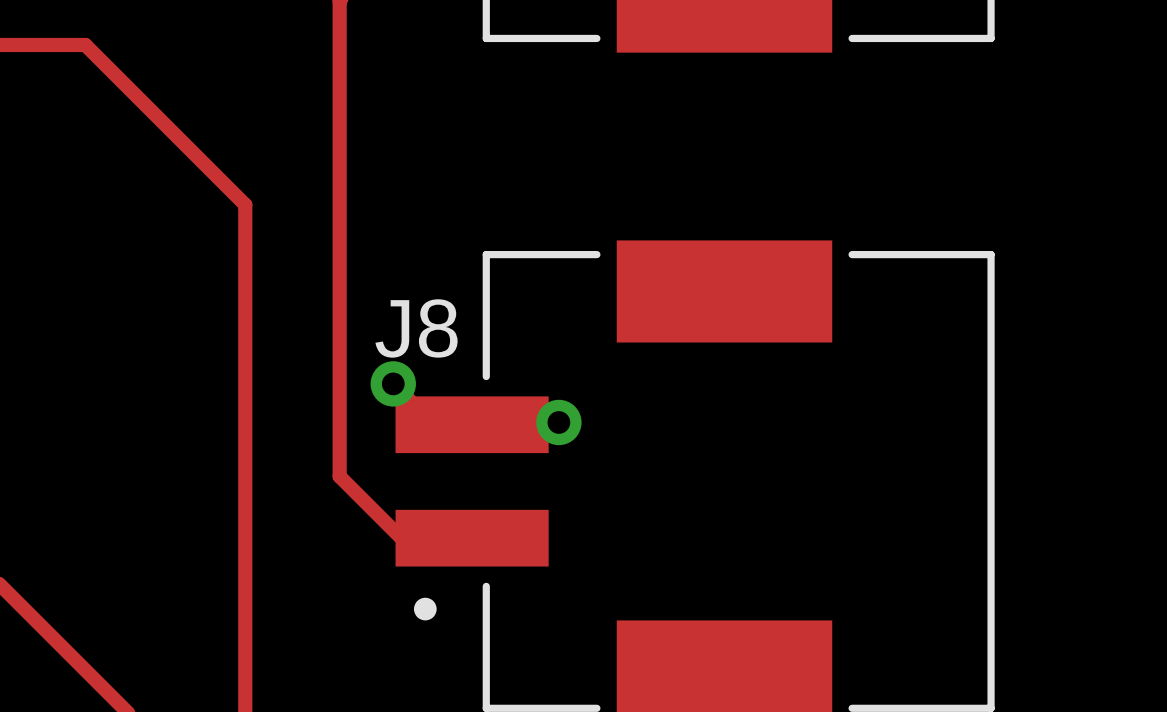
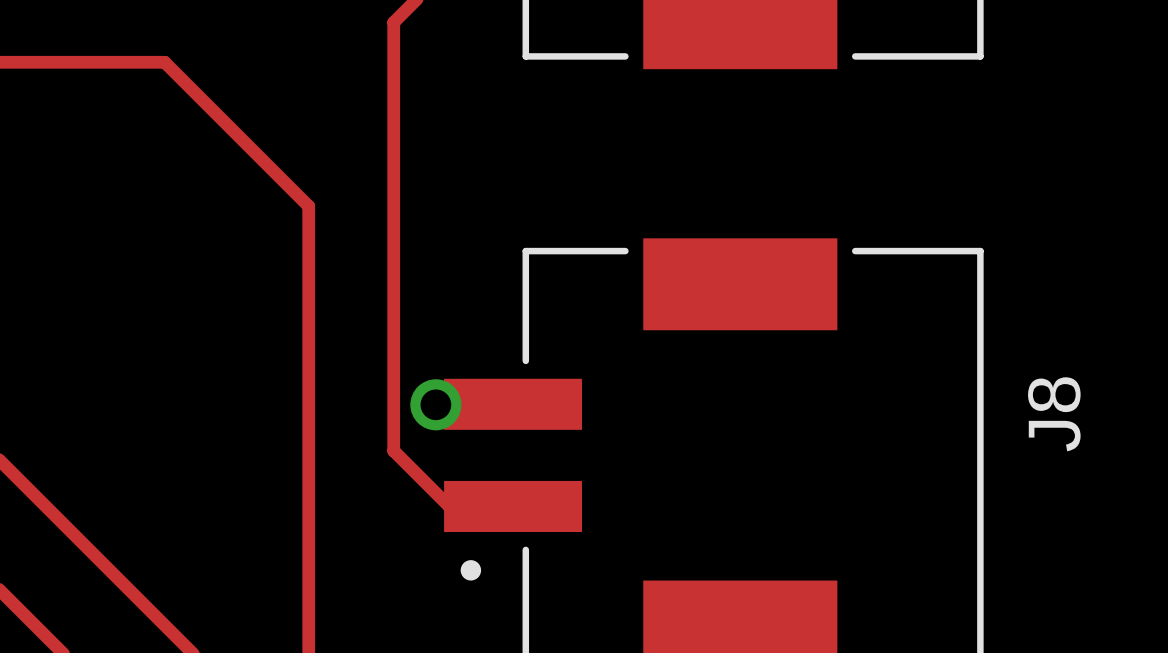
J8 name rotation: 0° (416, 328) -> 90° counterclockwise (1054, 414)
J8 name position: J8 (416, 328) -> J8 (1054, 414)
via position: (393, 383) -> (435, 404)
via: (558, 422) -> none

